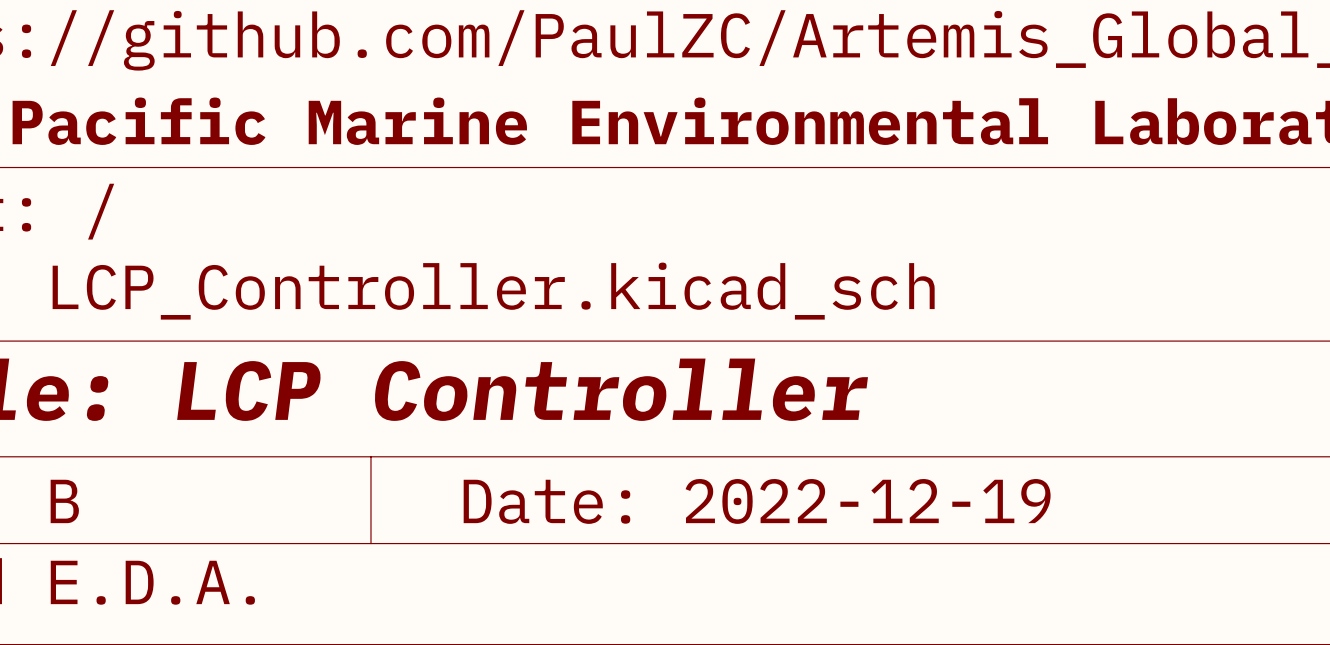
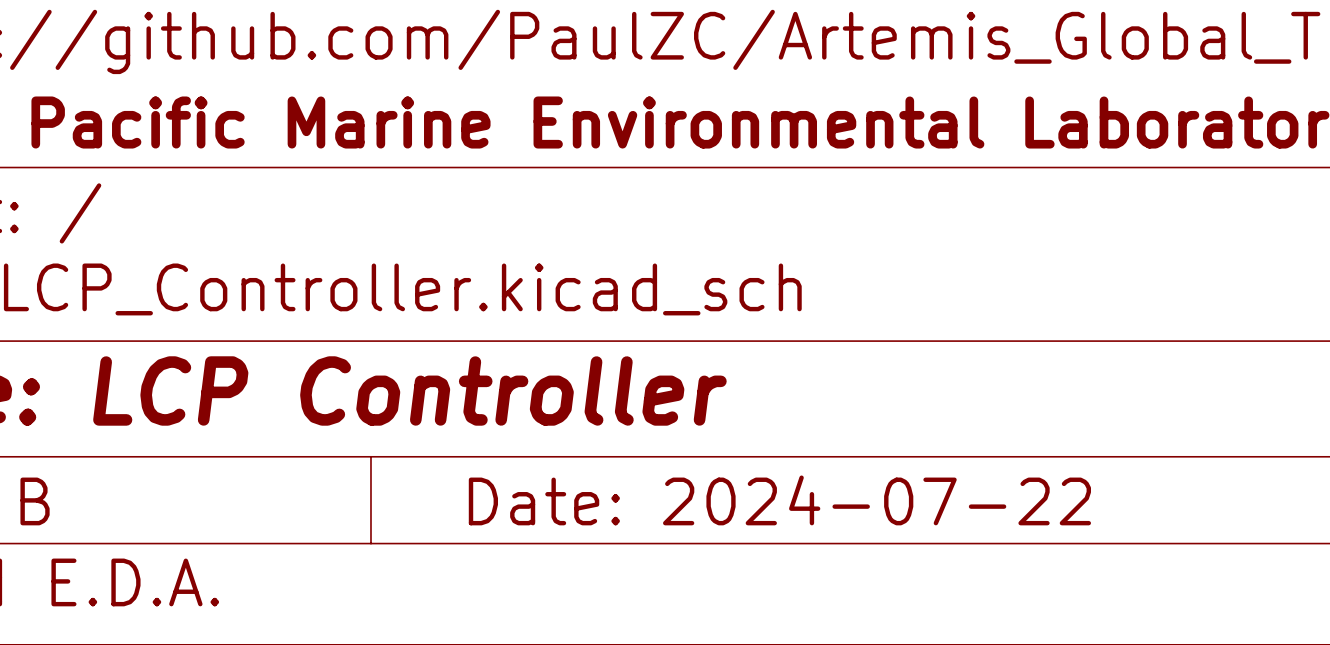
title block: Date: 2022-12-19 (757, 501) -> Date: 2024-07-22 (779, 500)

